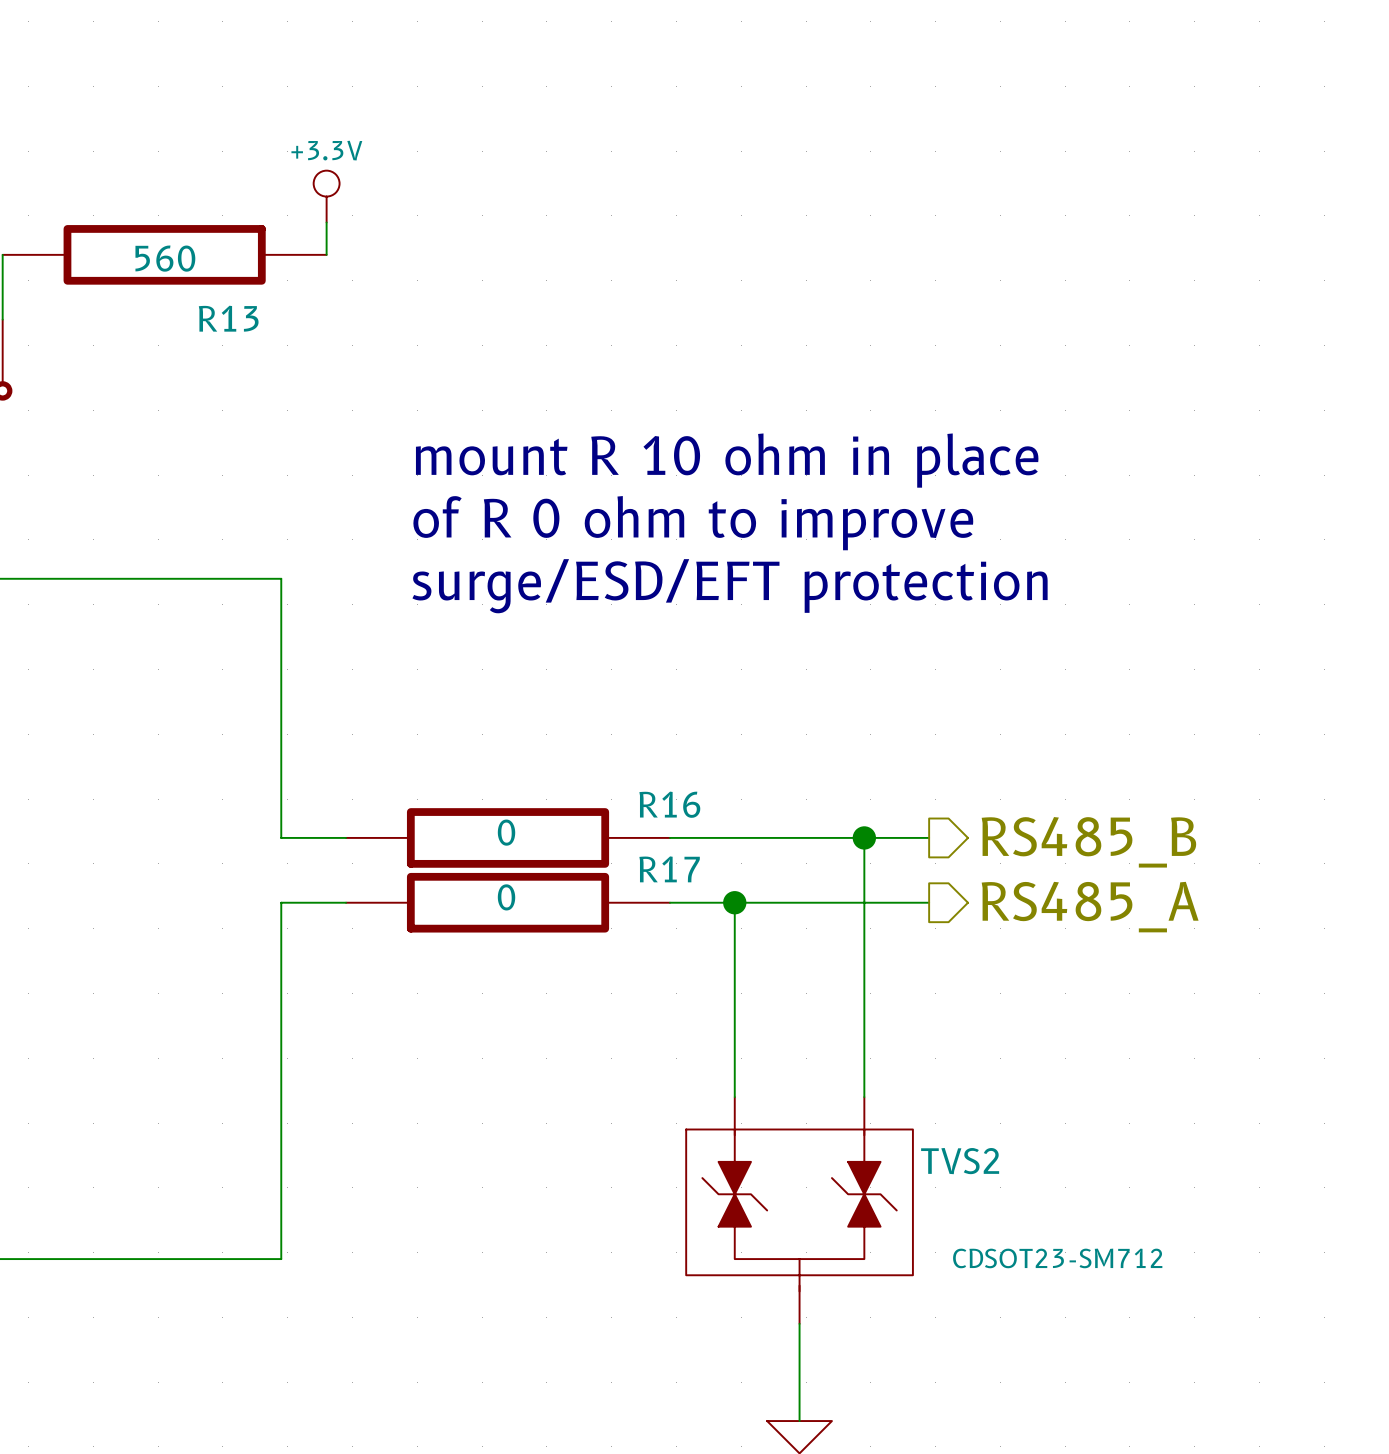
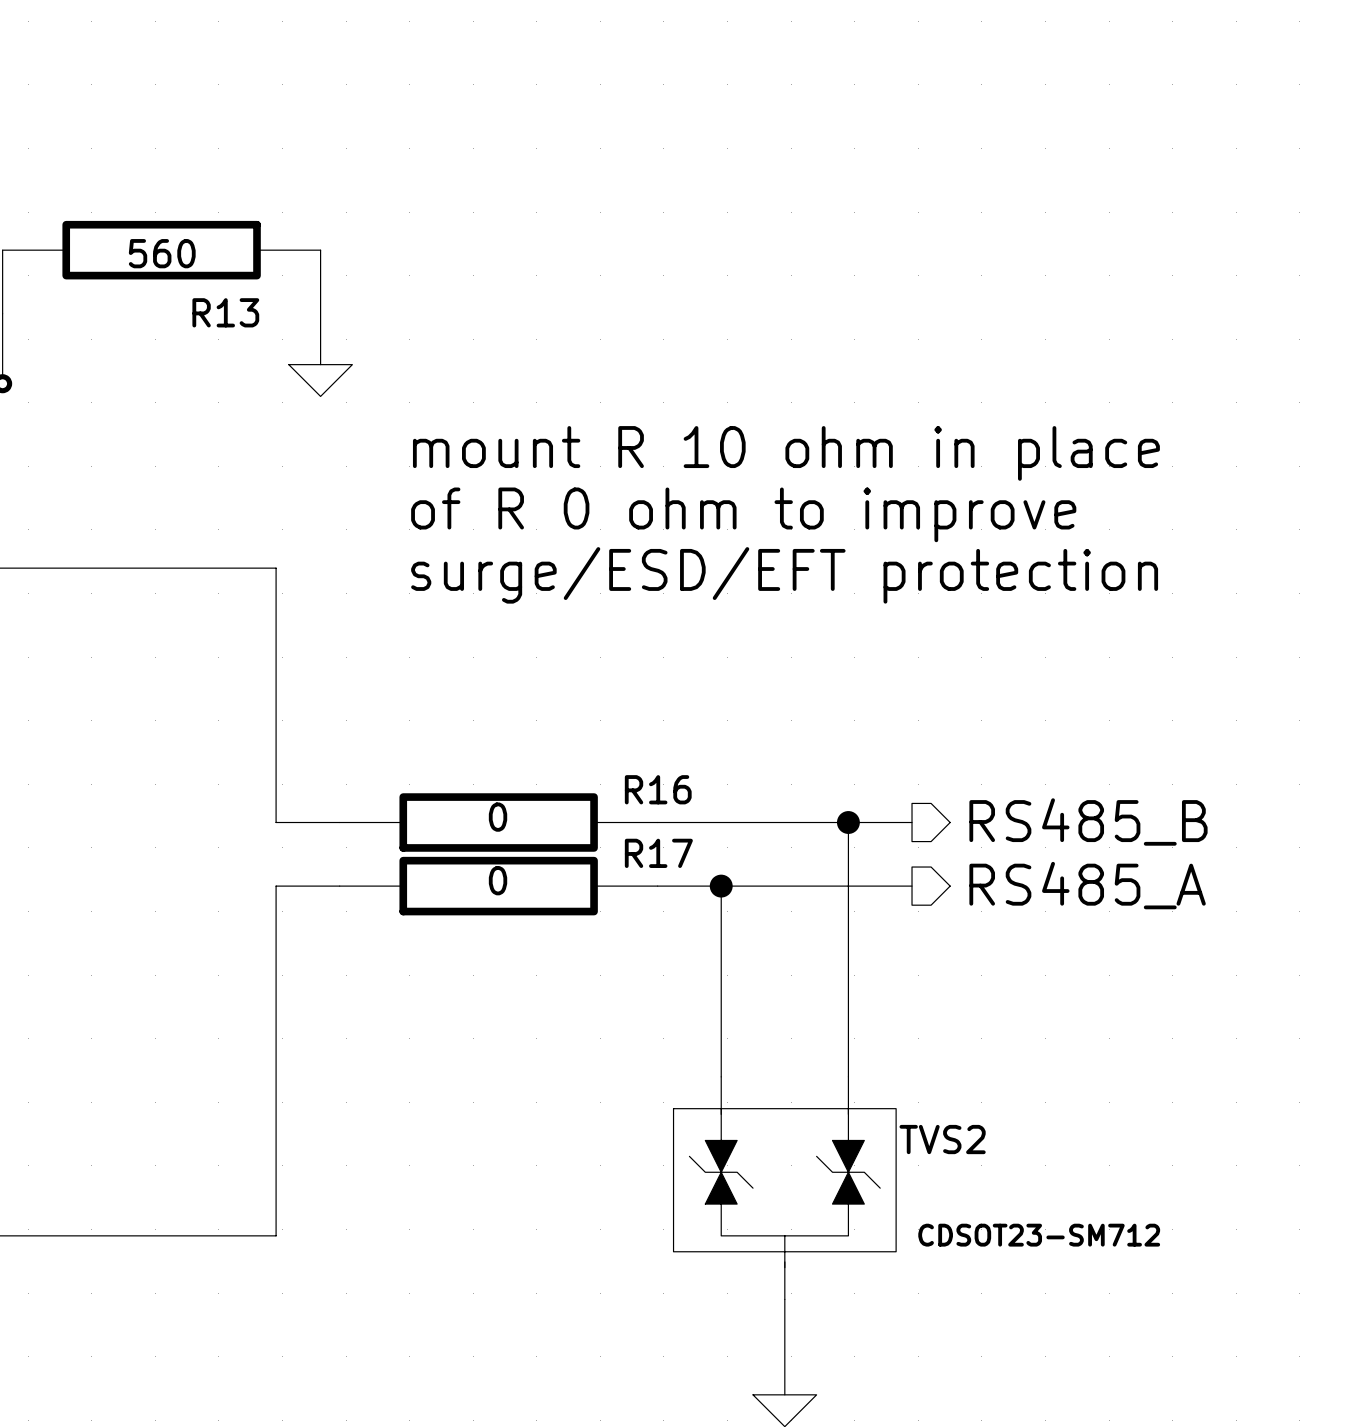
power symbol: +3.3V (326, 196) -> none
wire: (326, 222) (326, 254) -> (320, 364) (320, 250)
power symbol: none -> (320, 380)

